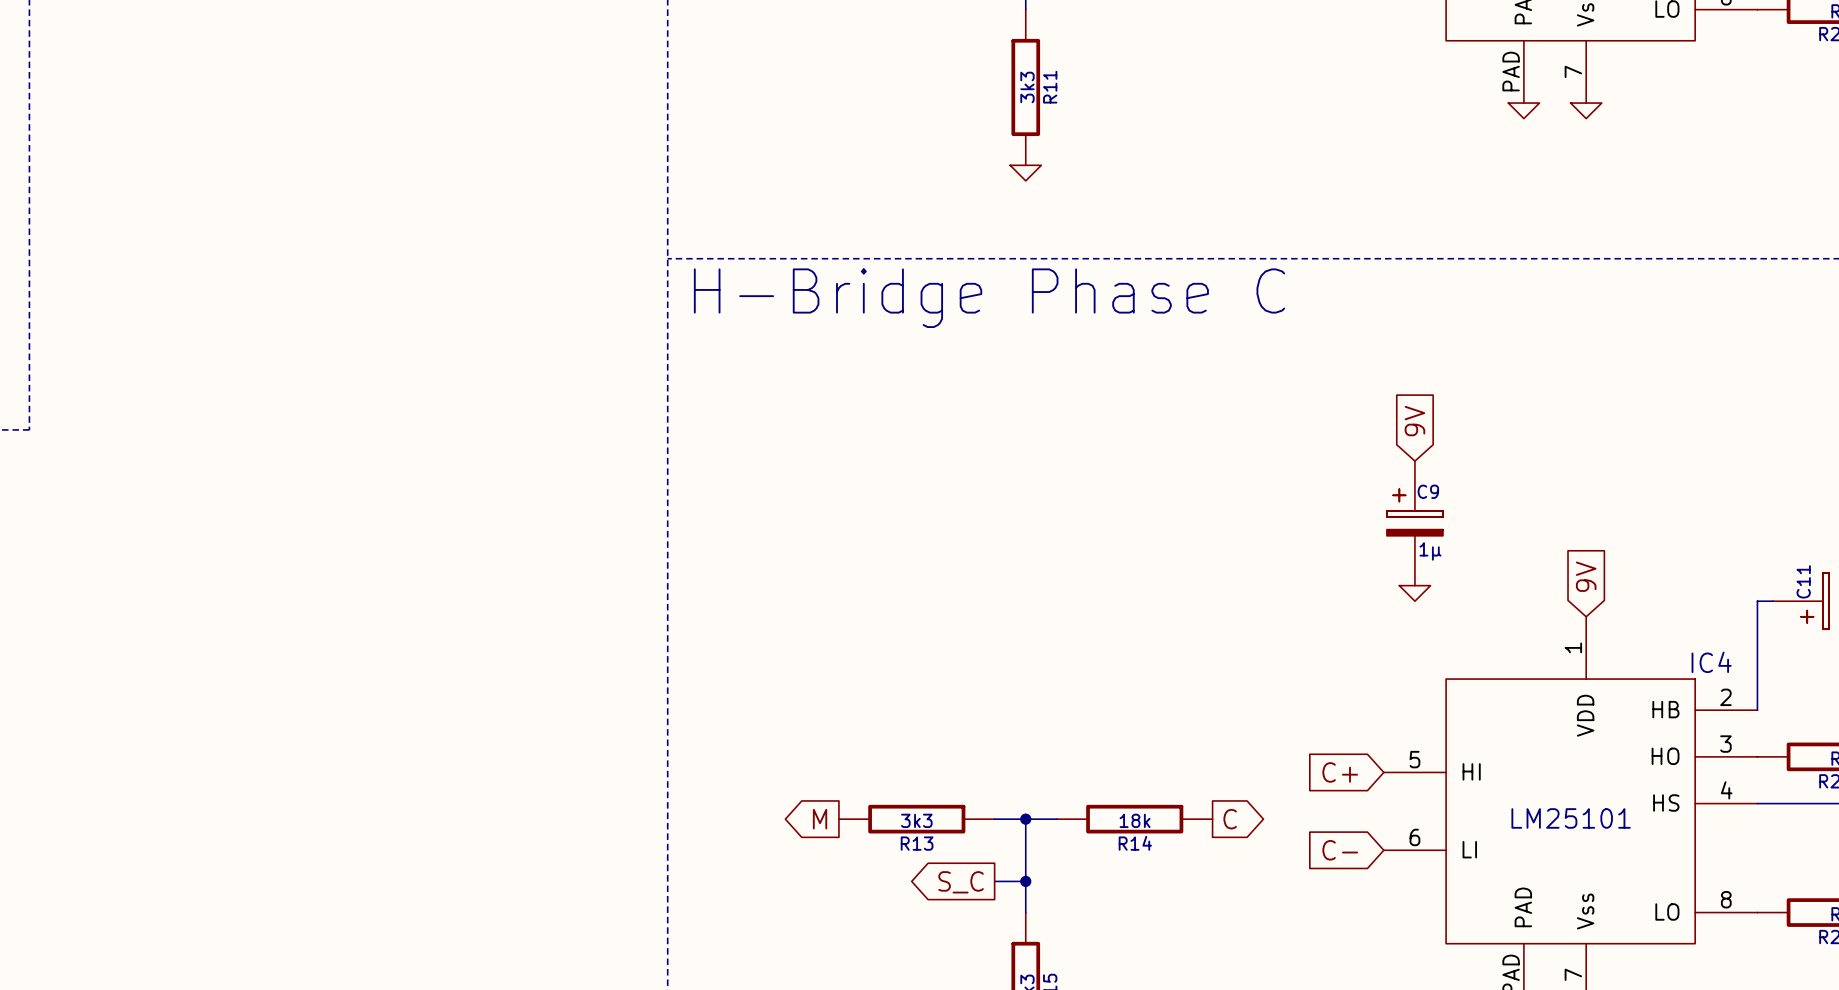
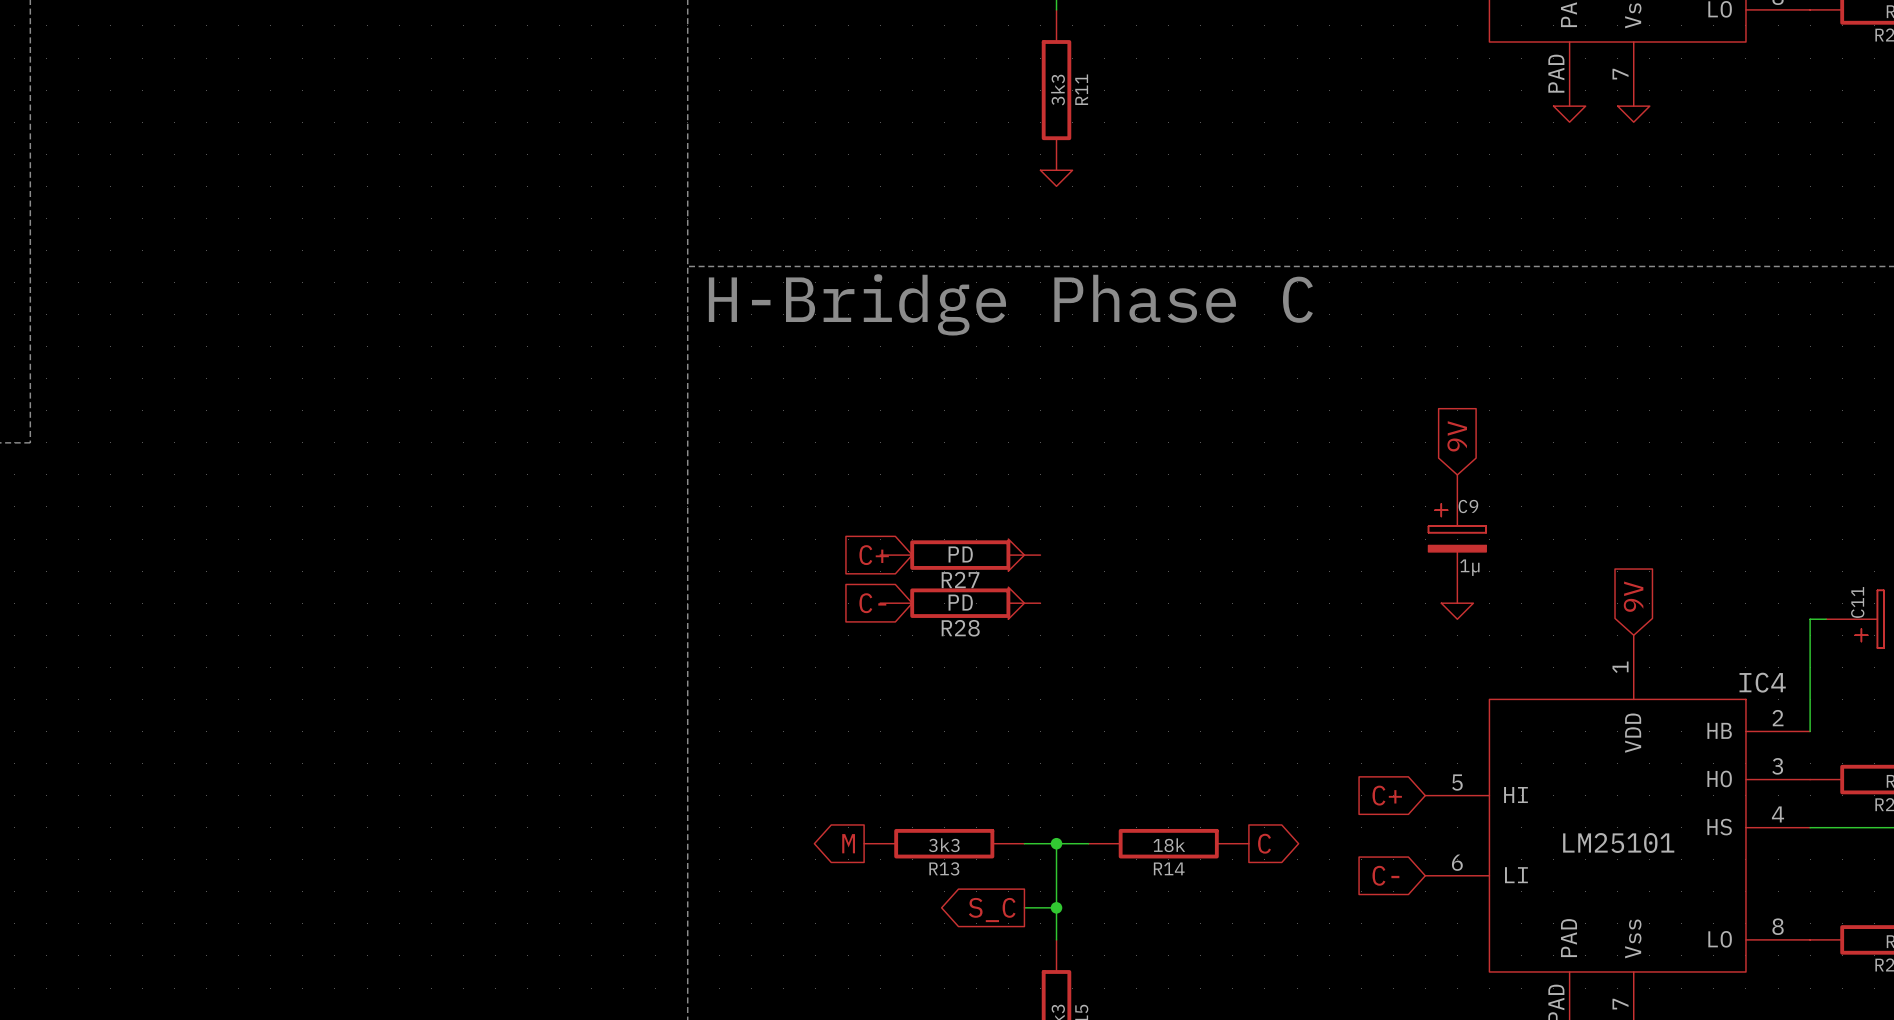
global label: none -> C+ (874, 555)
R27: none -> PD (960, 555)
power symbol: none -> (1016, 555)
global label: none -> C- (872, 603)
R28: none -> PD (960, 603)
power symbol: none -> (1016, 603)

